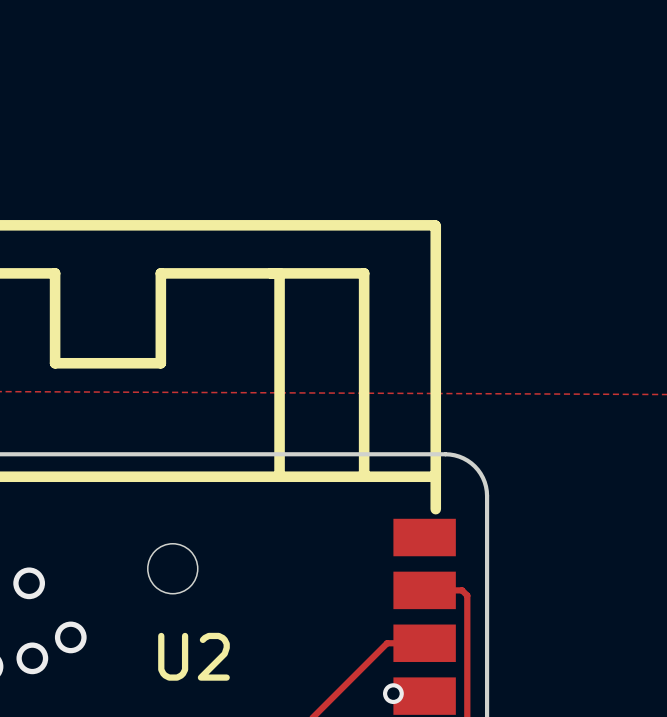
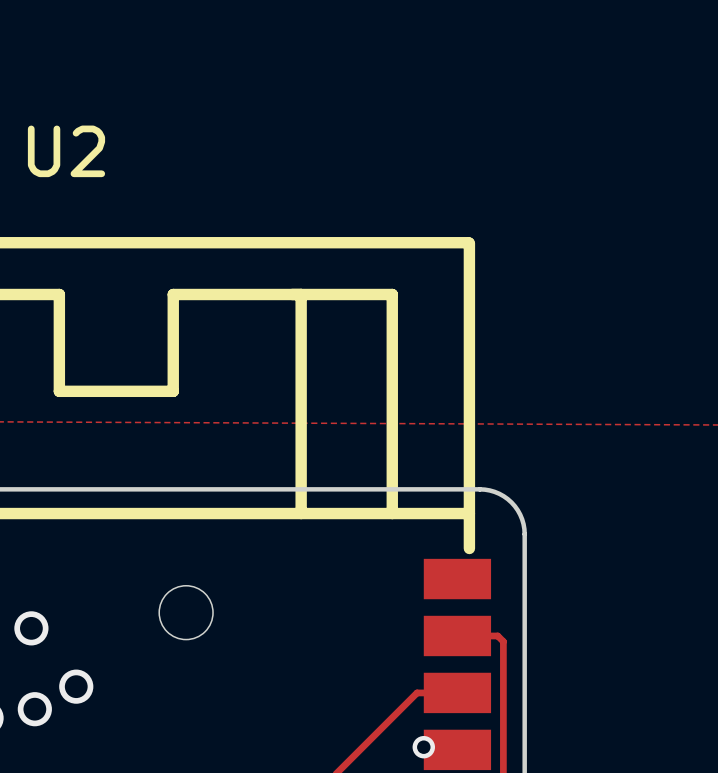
U2 name position: U2 (194, 656) -> U2 (66, 151)

